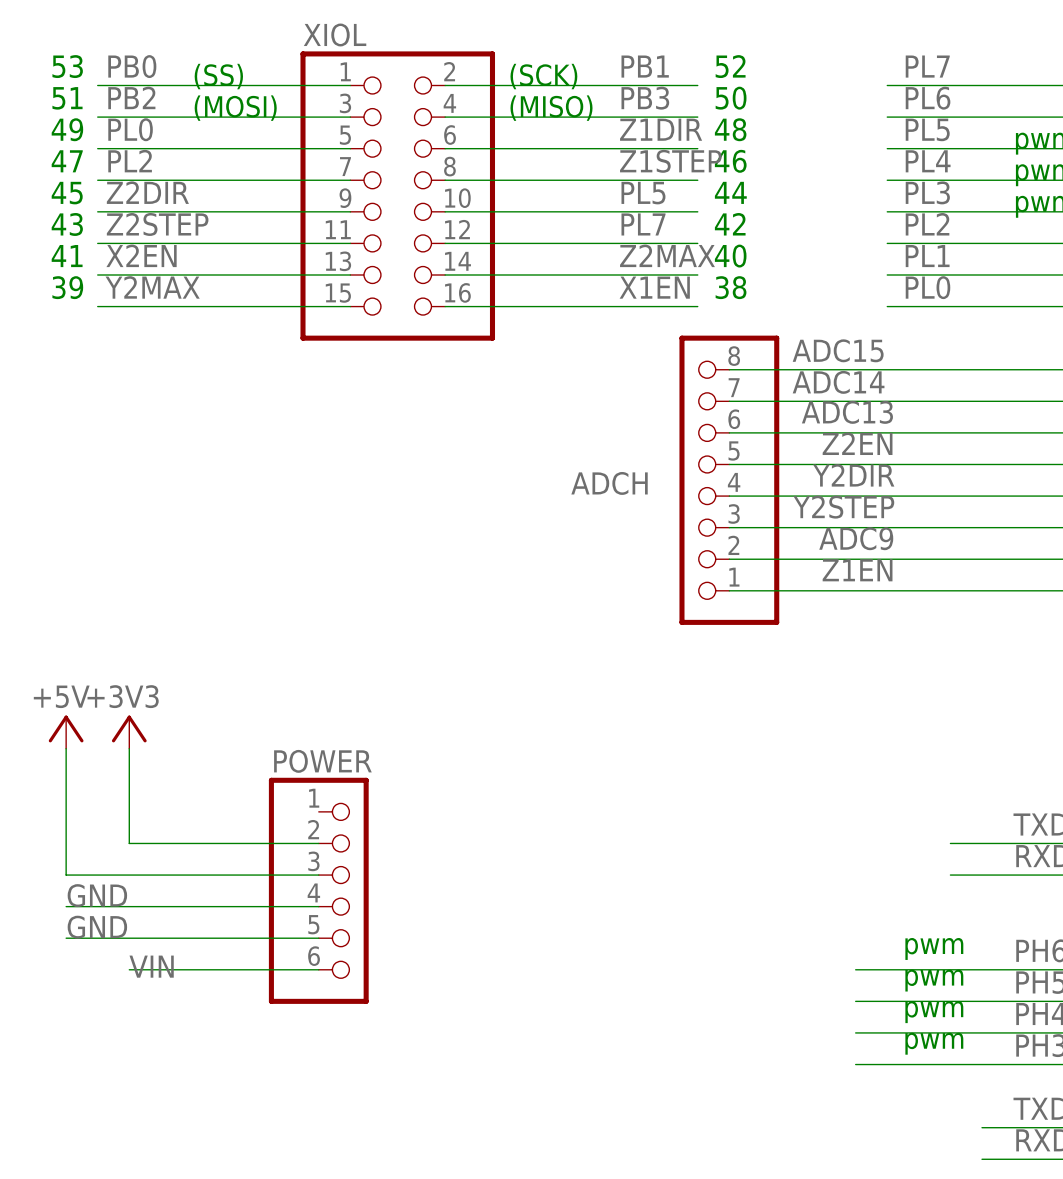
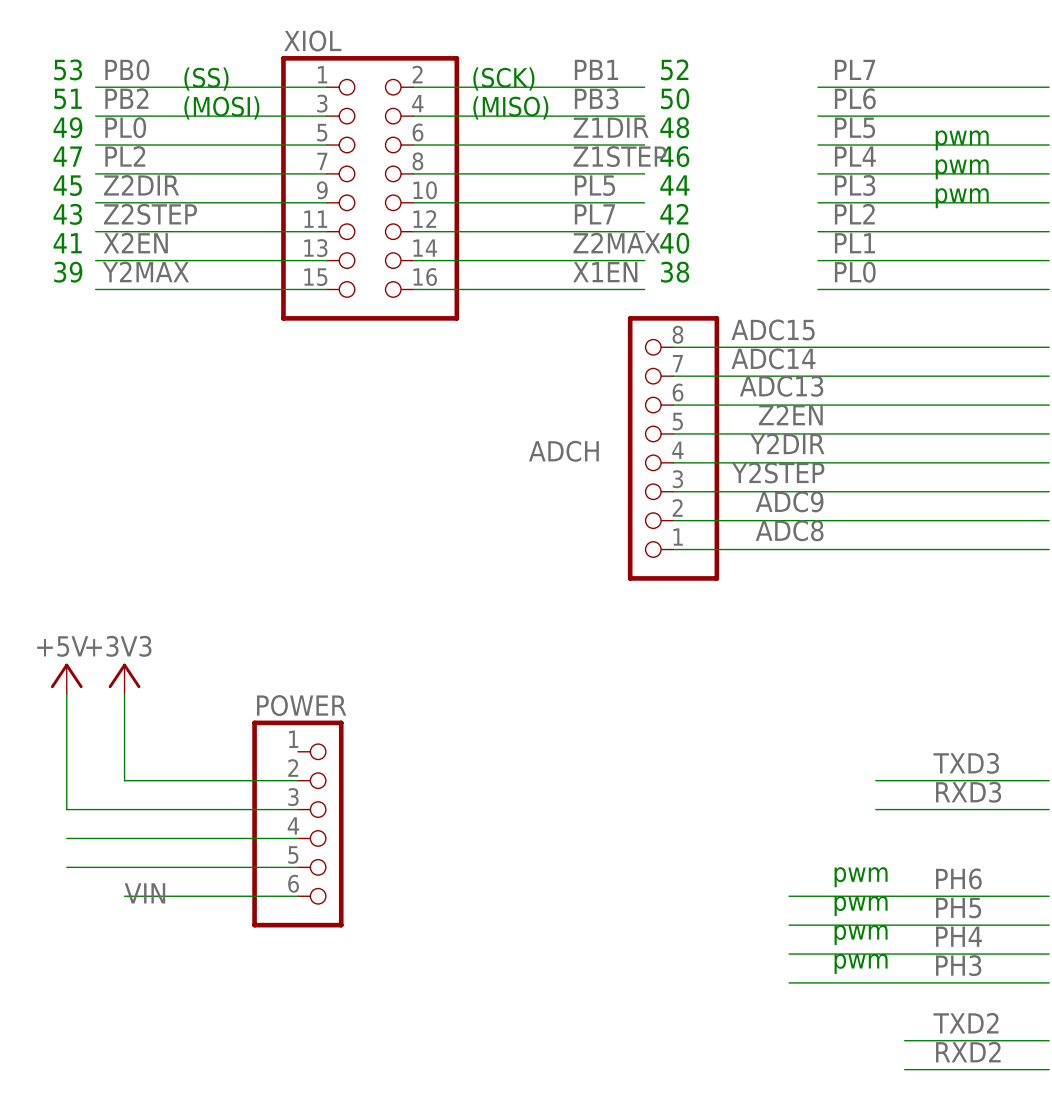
label: Z1EN (857, 570) -> ADC8 (789, 530)
label: GND (97, 895) -> none
label: GND (97, 927) -> none

